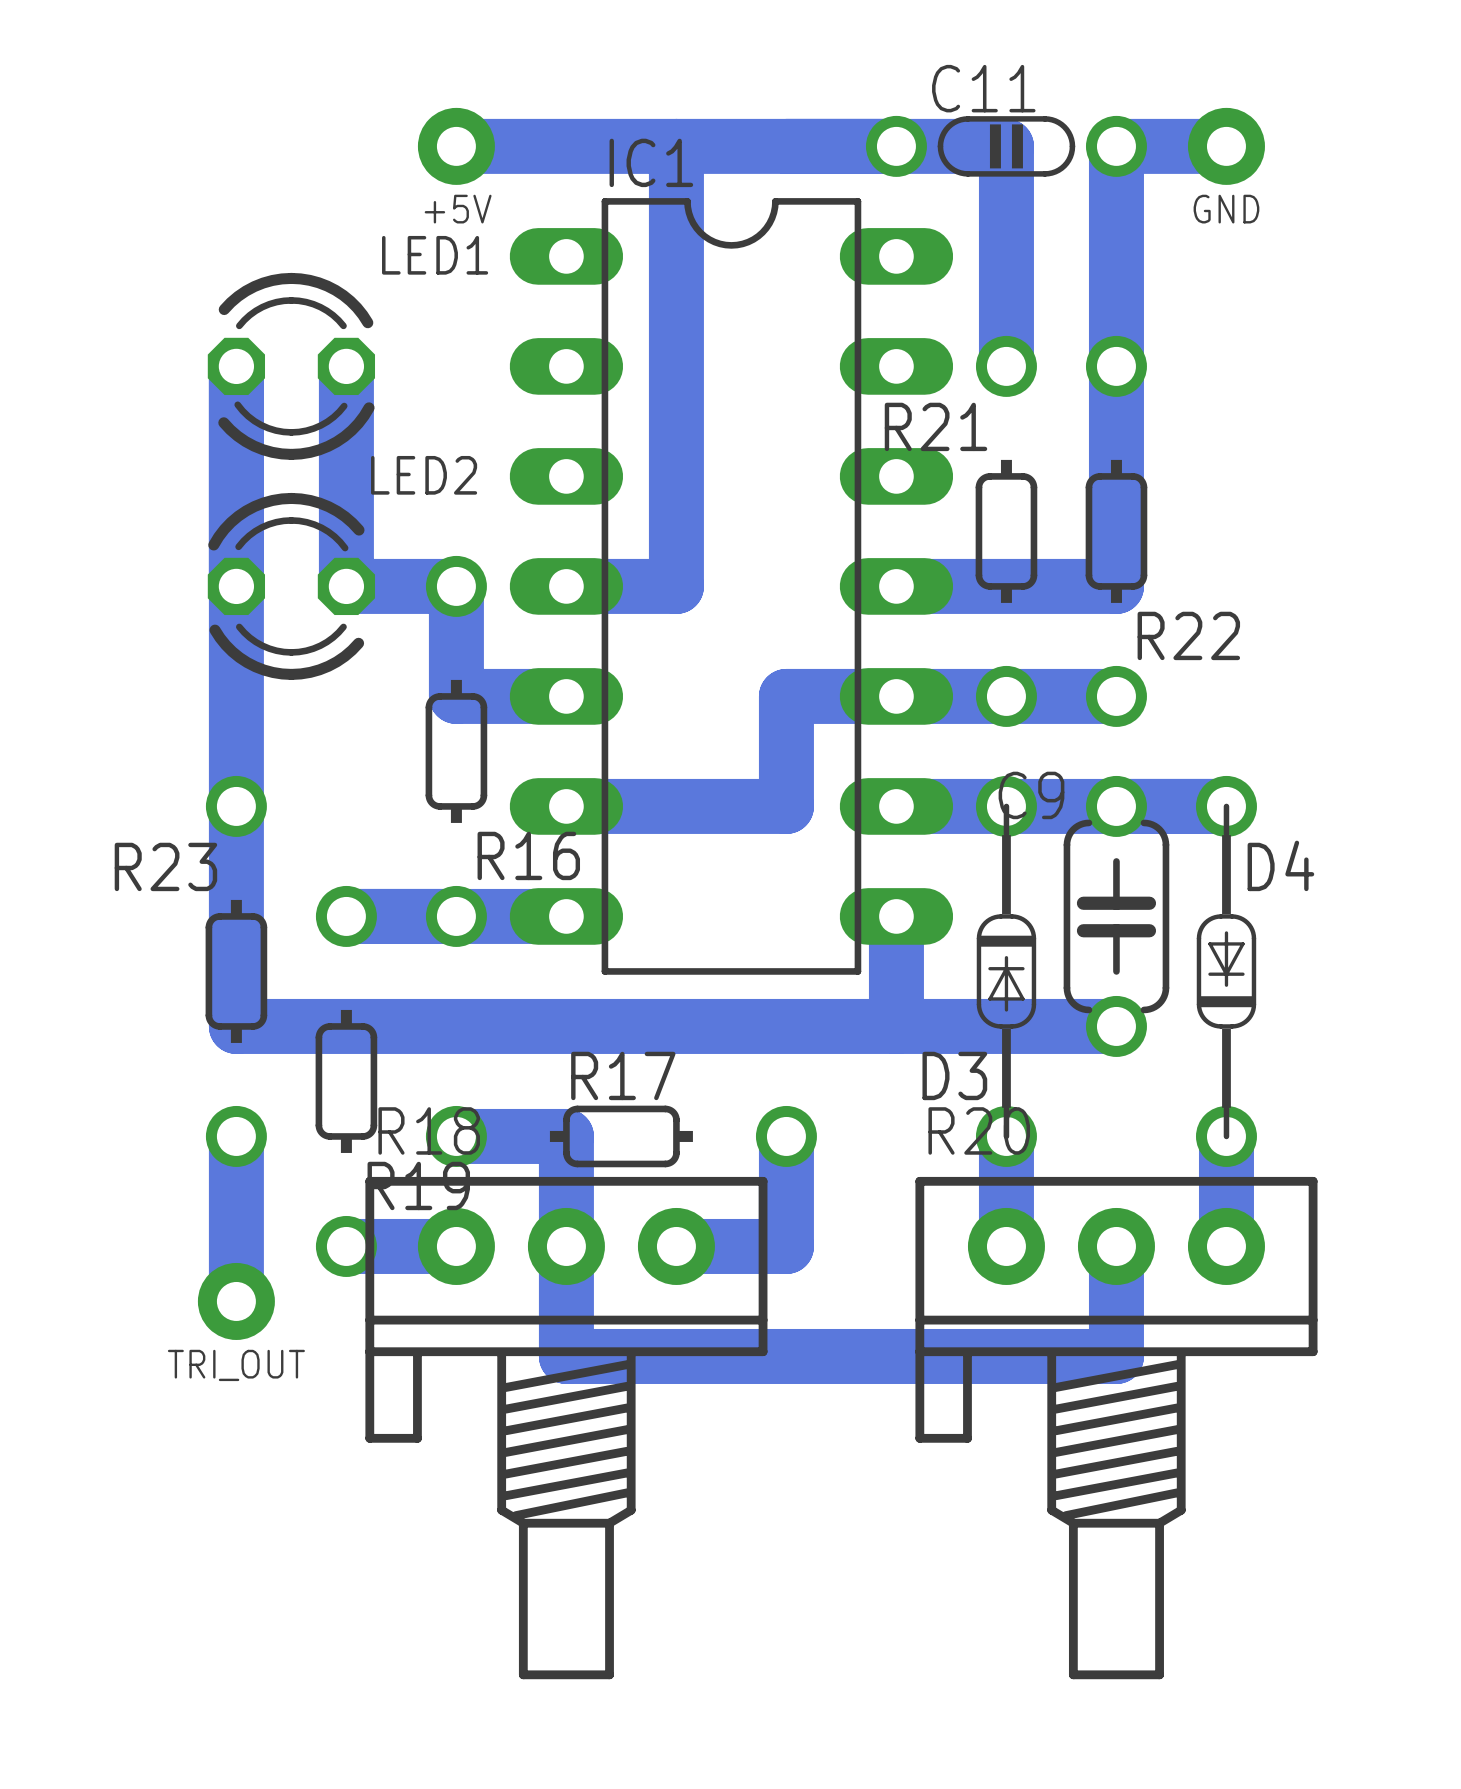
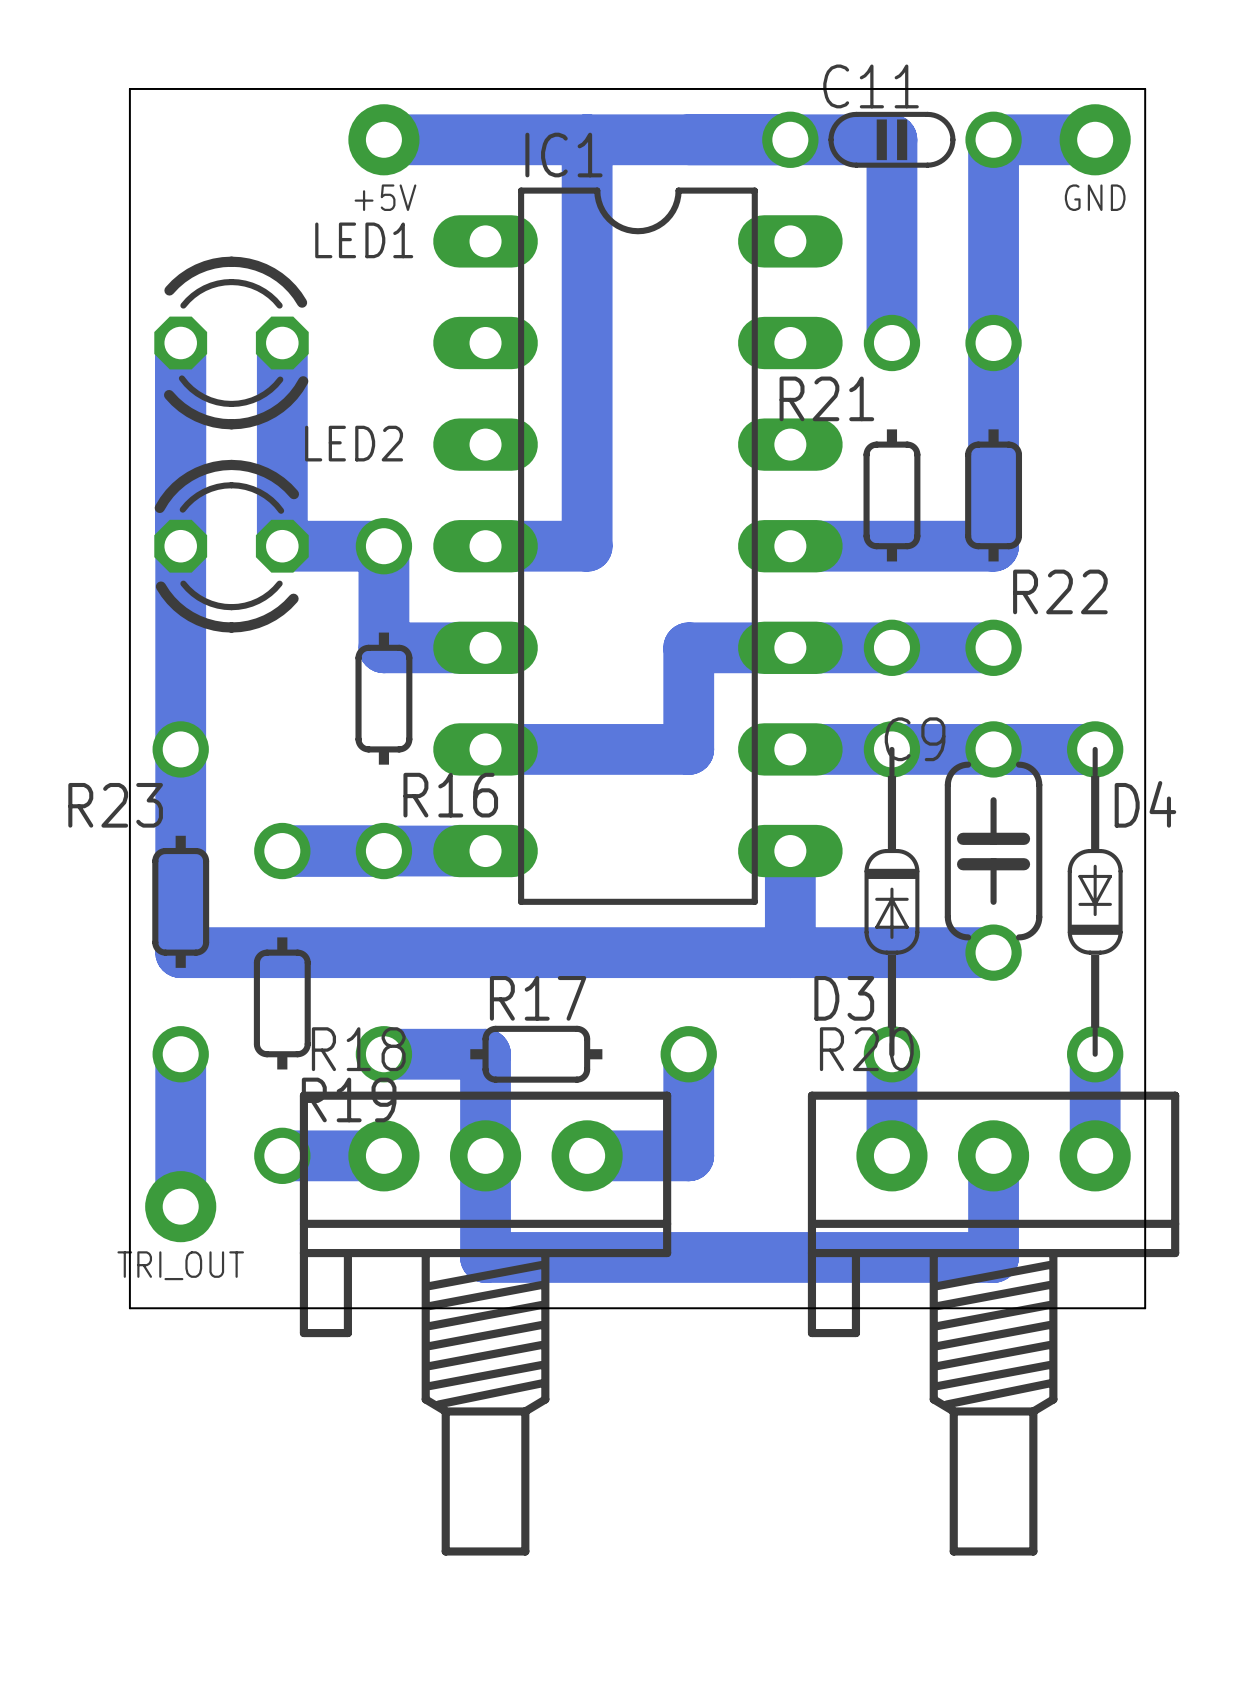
board edge: none -> (129, 88) (1145, 88) (1145, 1308) (129, 1308) (129, 88)

